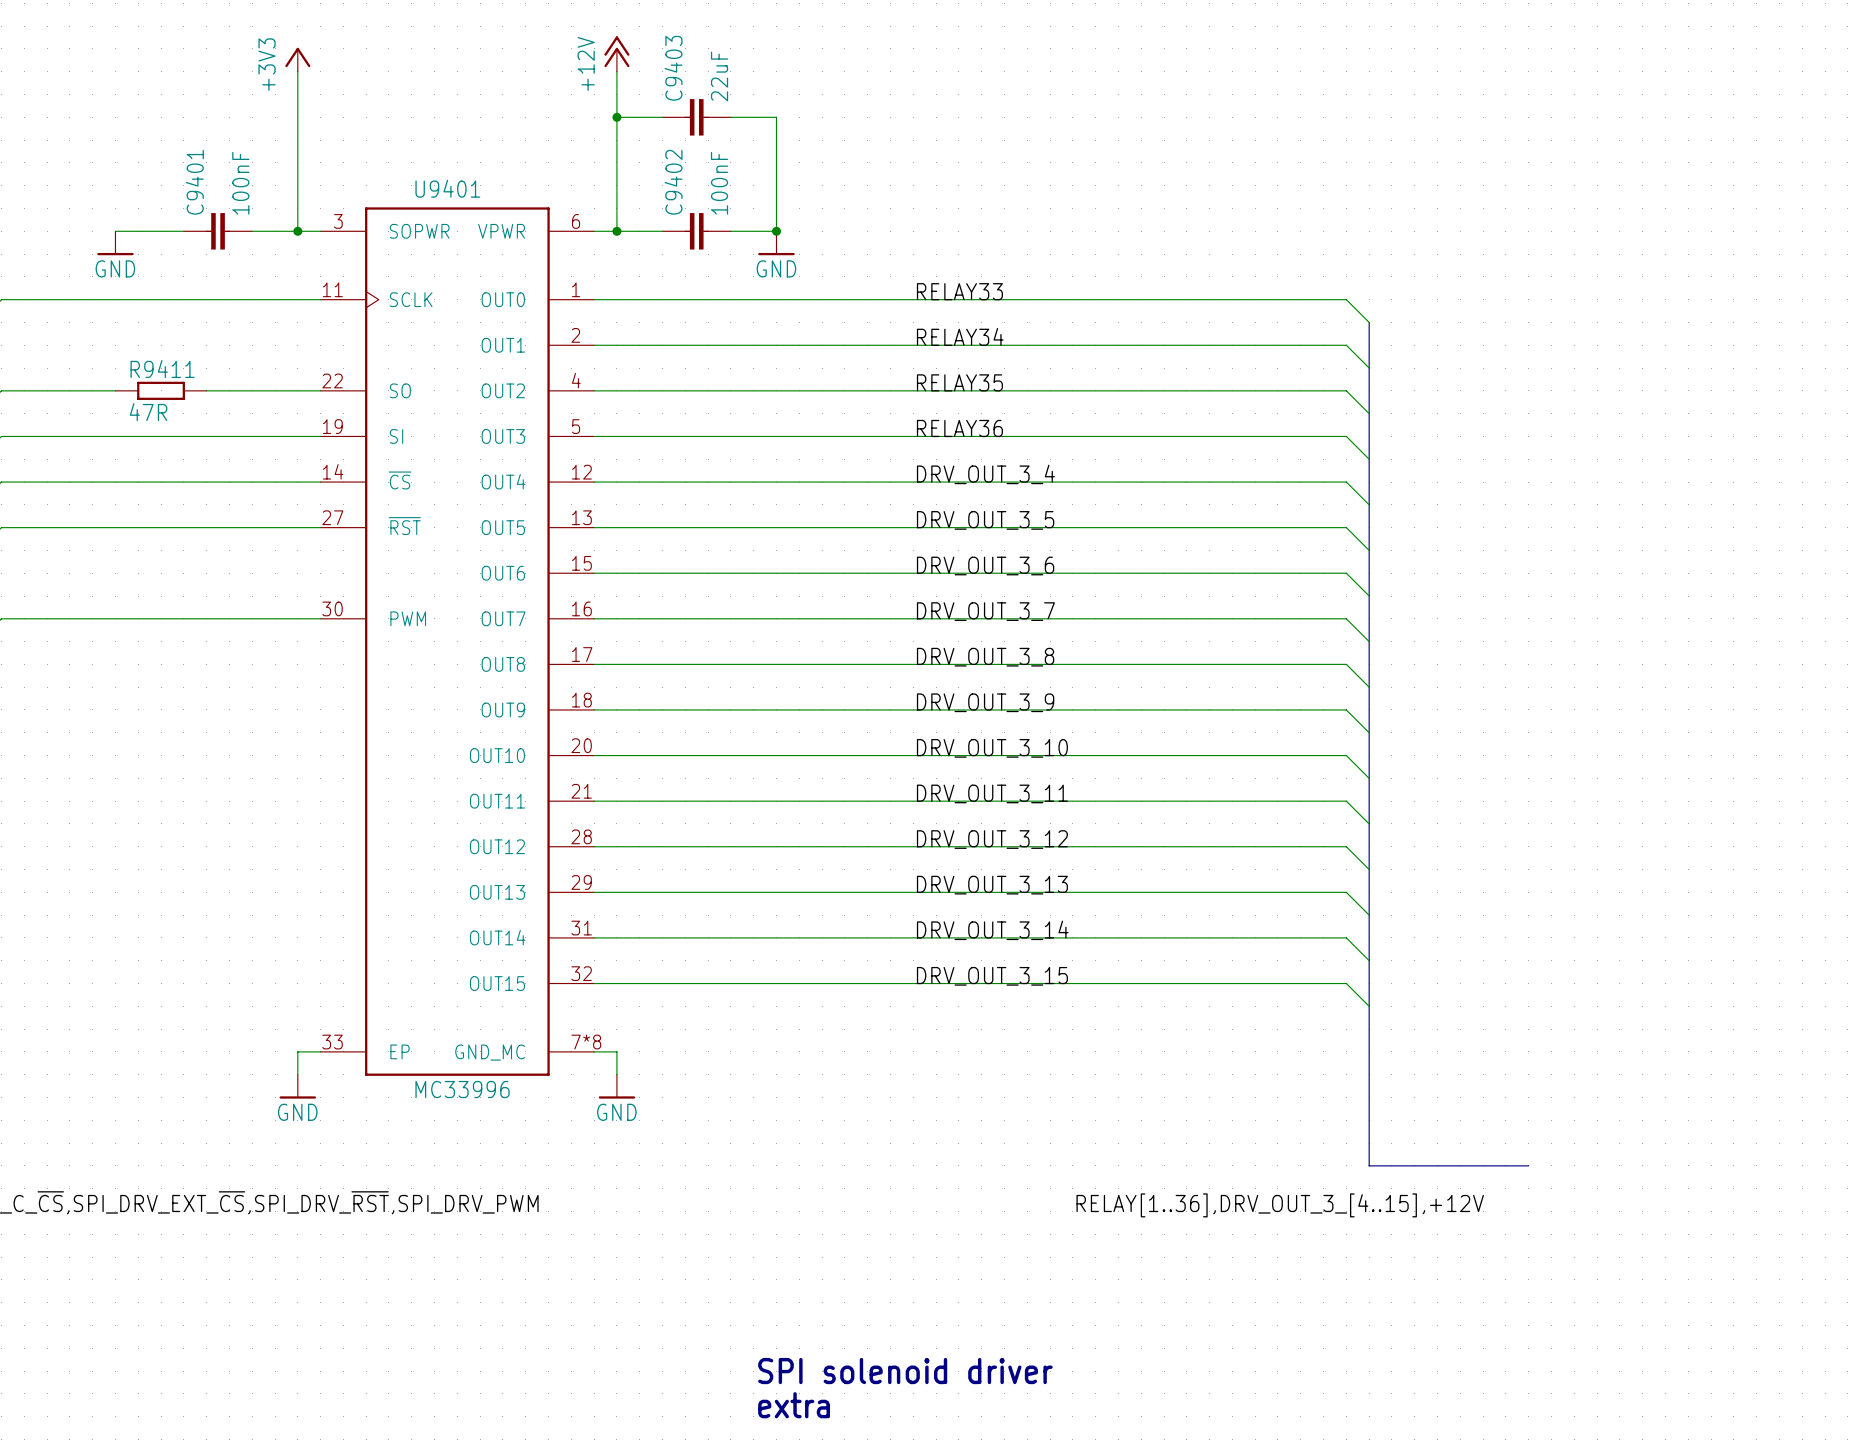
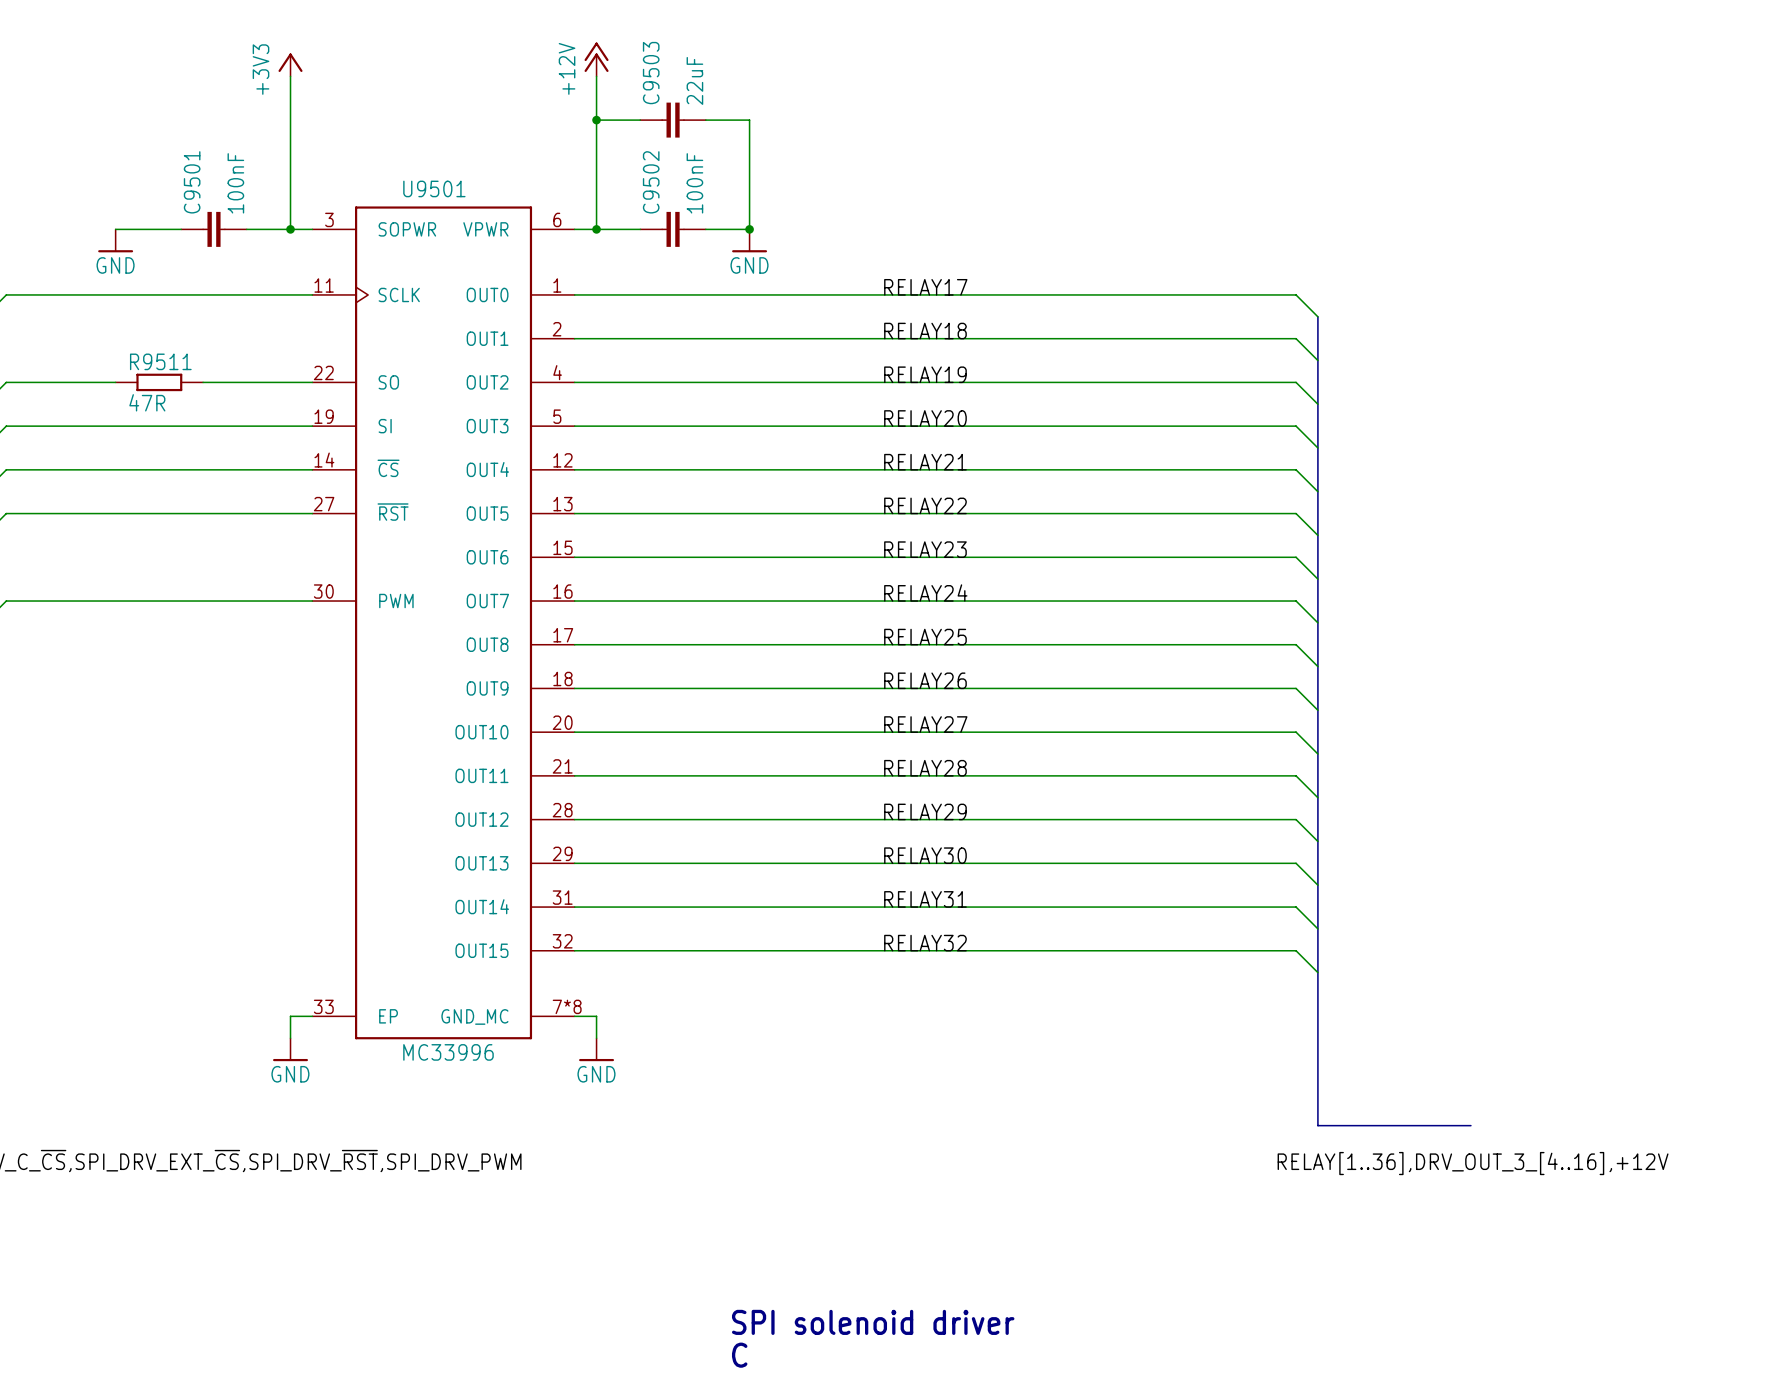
C9403 name: C9403 (673, 68) -> C9503 (651, 73)
C9401 name: C9401 (194, 182) -> C9501 (192, 182)
C9402 name: C9402 (673, 182) -> C9502 (651, 182)
U9401 name: U9401 (447, 188) -> U9501 (434, 188)
label: RELAY33 (959, 291) -> RELAY17 (925, 287)
label: RELAY34 (960, 336) -> RELAY18 (925, 331)
R9411 name: R9411 (162, 369) -> R9511 (160, 361)
label: RELAY35 (959, 382) -> RELAY19 (925, 374)
label: RELAY36 (959, 428) -> RELAY20 (925, 418)
label: DRV_OUT_3_4 (985, 474) -> RELAY21 (925, 462)
label: DRV_OUT_3_5 (985, 520) -> RELAY22 (925, 505)
label: DRV_OUT_3_6 (985, 566) -> RELAY23 (925, 549)
label: DRV_OUT_3_7 (985, 611) -> RELAY24 (925, 592)
label: DRV_OUT_3_8 (985, 657) -> RELAY25 (925, 637)
label: DRV_OUT_3_9 (985, 702) -> RELAY26 (925, 680)
label: DRV_OUT_3_10 (992, 748) -> RELAY27 (925, 724)
label: DRV_OUT_3_11 (992, 793) -> RELAY28 (925, 768)
label: DRV_OUT_3_12 (992, 839) -> RELAY29 (925, 811)
label: DRV_OUT_3_13 (992, 885) -> RELAY30 (925, 855)
label: DRV_OUT_3_14 (992, 930) -> RELAY31 (925, 899)
label: DRV_OUT_3_15 (992, 976) -> RELAY32 (925, 943)
label: RELAY[1..36],DRV_OUT_3_[4..15],+12V (1280, 1205) -> none
label: none -> RELAY[1..36],DRV_OUT_3_[4..16],+12V (1473, 1163)
text: extra (794, 1405) -> C (739, 1355)

